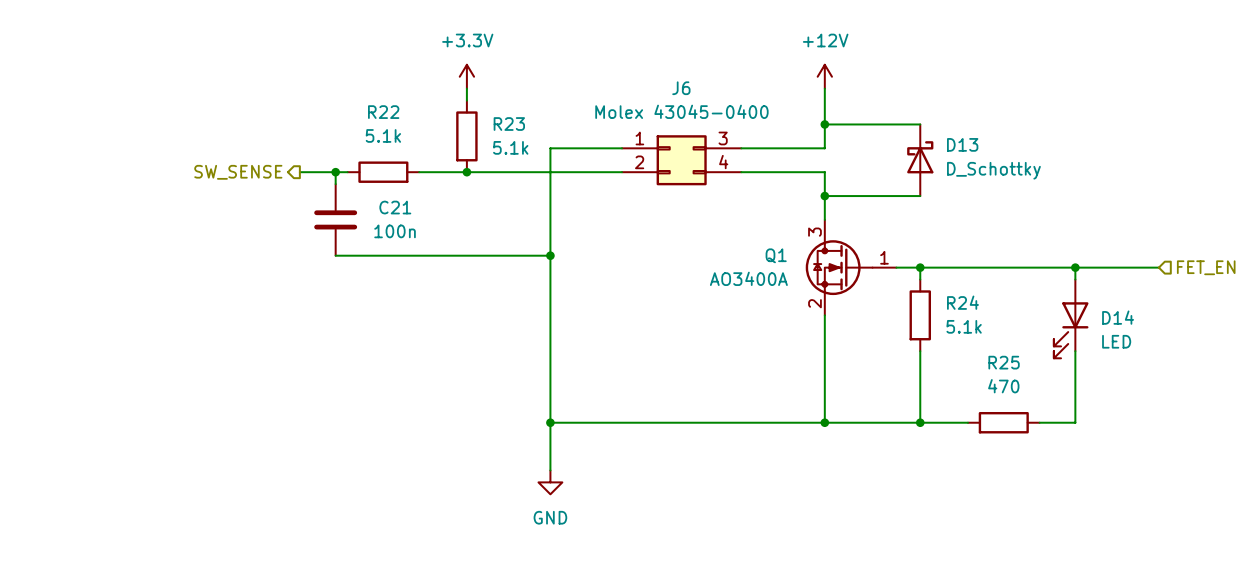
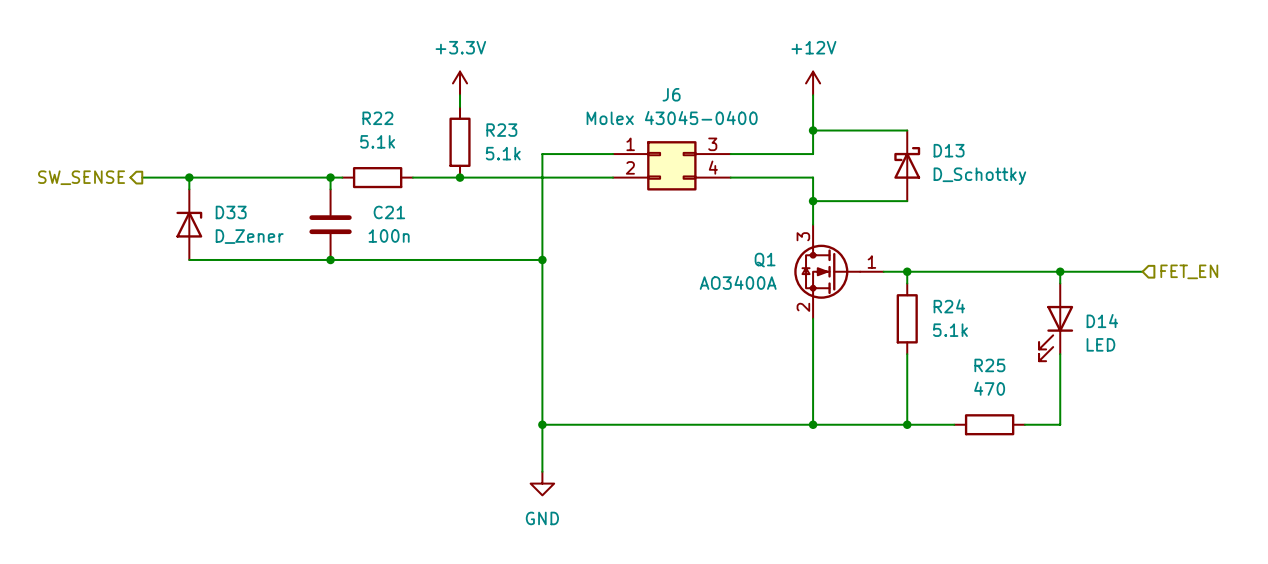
wire: none -> (142, 177) (295, 177)
wire: none -> (189, 177) (189, 189)
junction: none -> (189, 177)
hierarchical label position: SW_SENSE (238, 172) -> SW_SENSE (81, 177)
D33: none -> D_Zener (189, 224)
wire: none -> (189, 259) (330, 259)
junction: none -> (330, 259)

